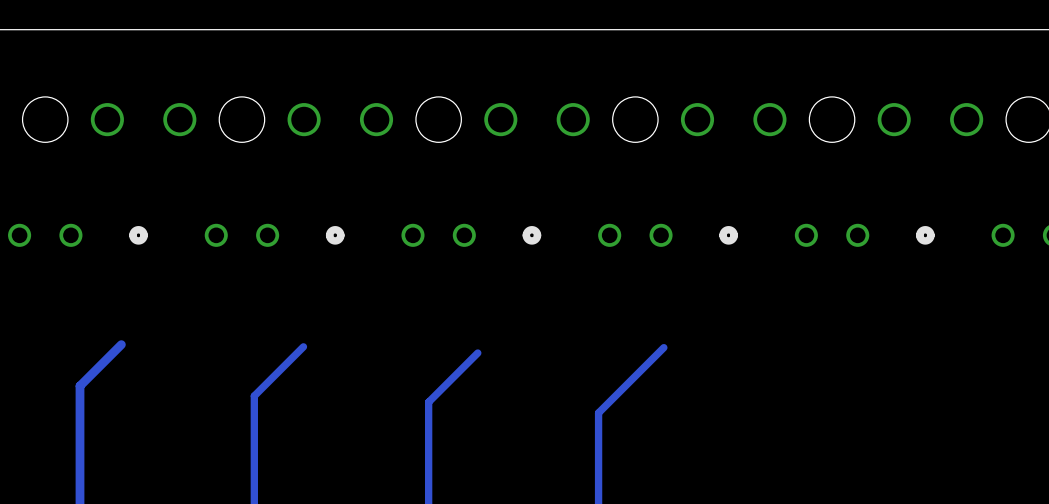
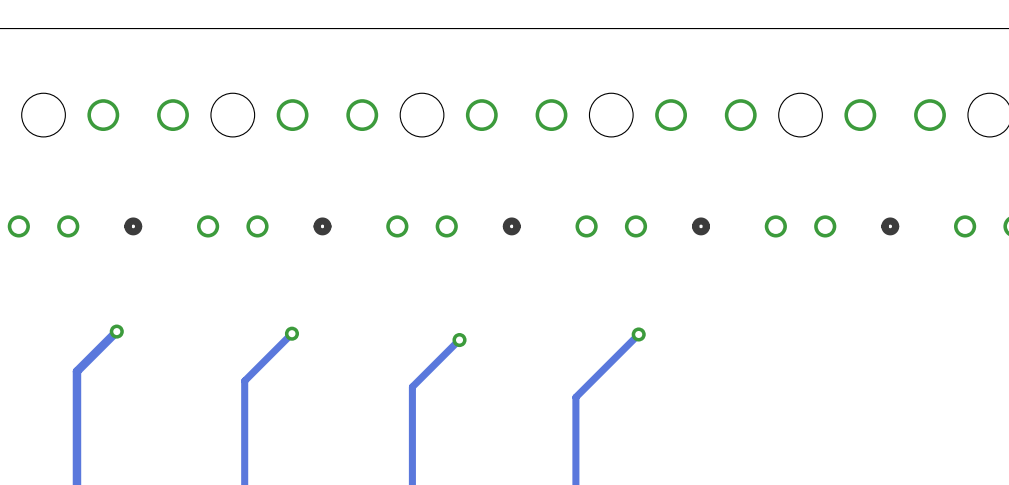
via: none -> (116, 331)
via: none -> (291, 333)
via: none -> (638, 334)
via: none -> (459, 340)

